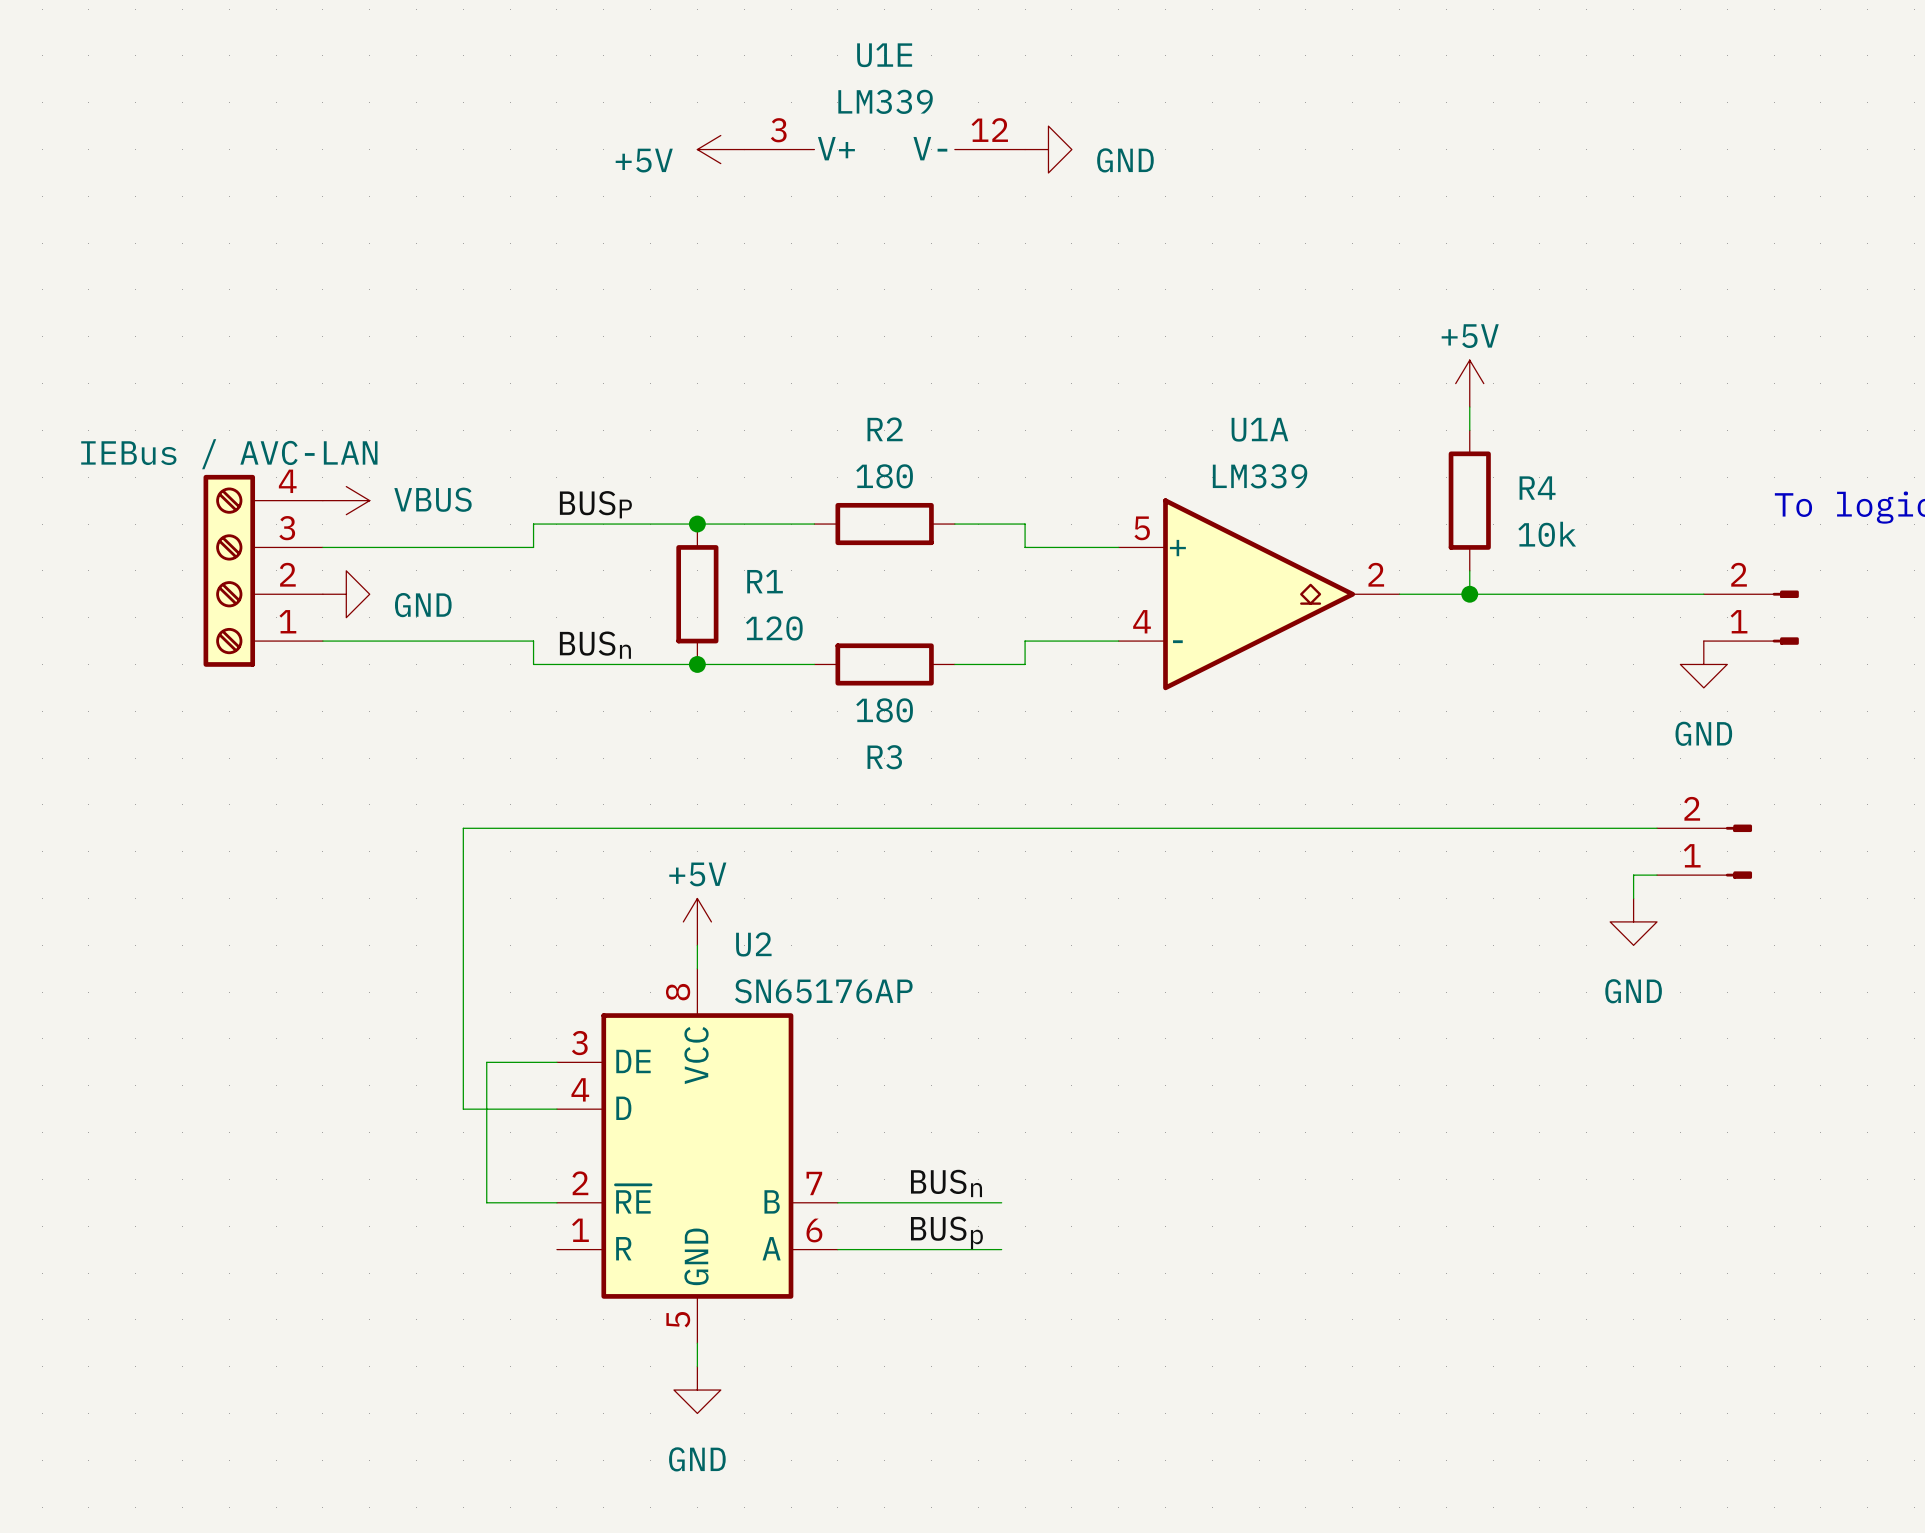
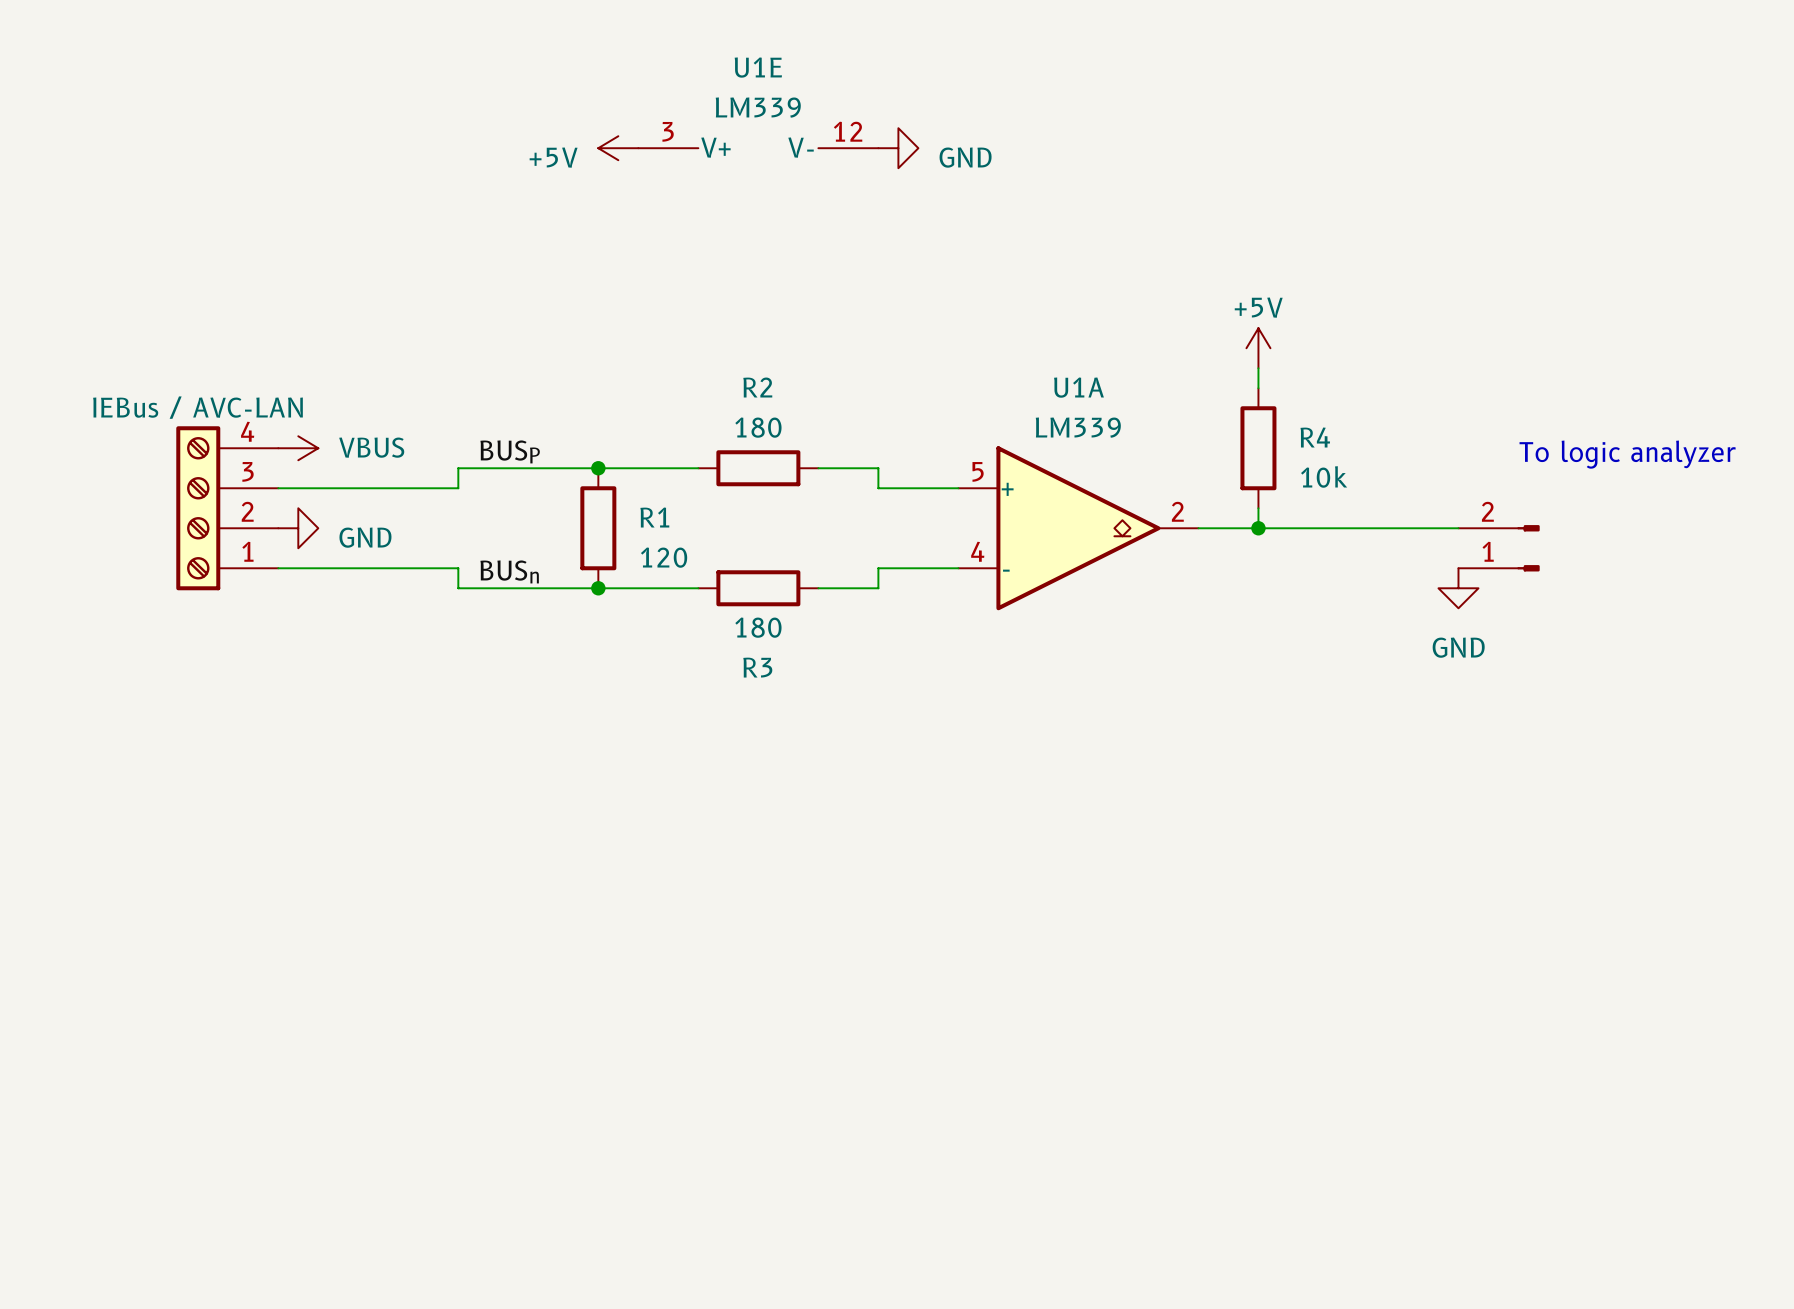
wire: (1657, 828) (463, 828) (463, 1109) (556, 1109) -> none
part: (1704, 851) -> none
wire: (1657, 875) (1633, 875) (1633, 898) -> none
power symbol: +5V (697, 921) -> none
power symbol: GND (1633, 921) -> none
wire: (697, 945) (697, 968) -> none
wire: (556, 1062) (486, 1062) (486, 1202) (556, 1202) -> none
U2: SN65176AP (697, 1155) -> none
label: BUSn (946, 1183) -> none
wire: (837, 1202) (1001, 1202) -> none
label: BUSp (946, 1232) -> none
wire: (837, 1249) (1001, 1249) -> none
wire: (697, 1343) (697, 1366) -> none
power symbol: GND (697, 1390) -> none

